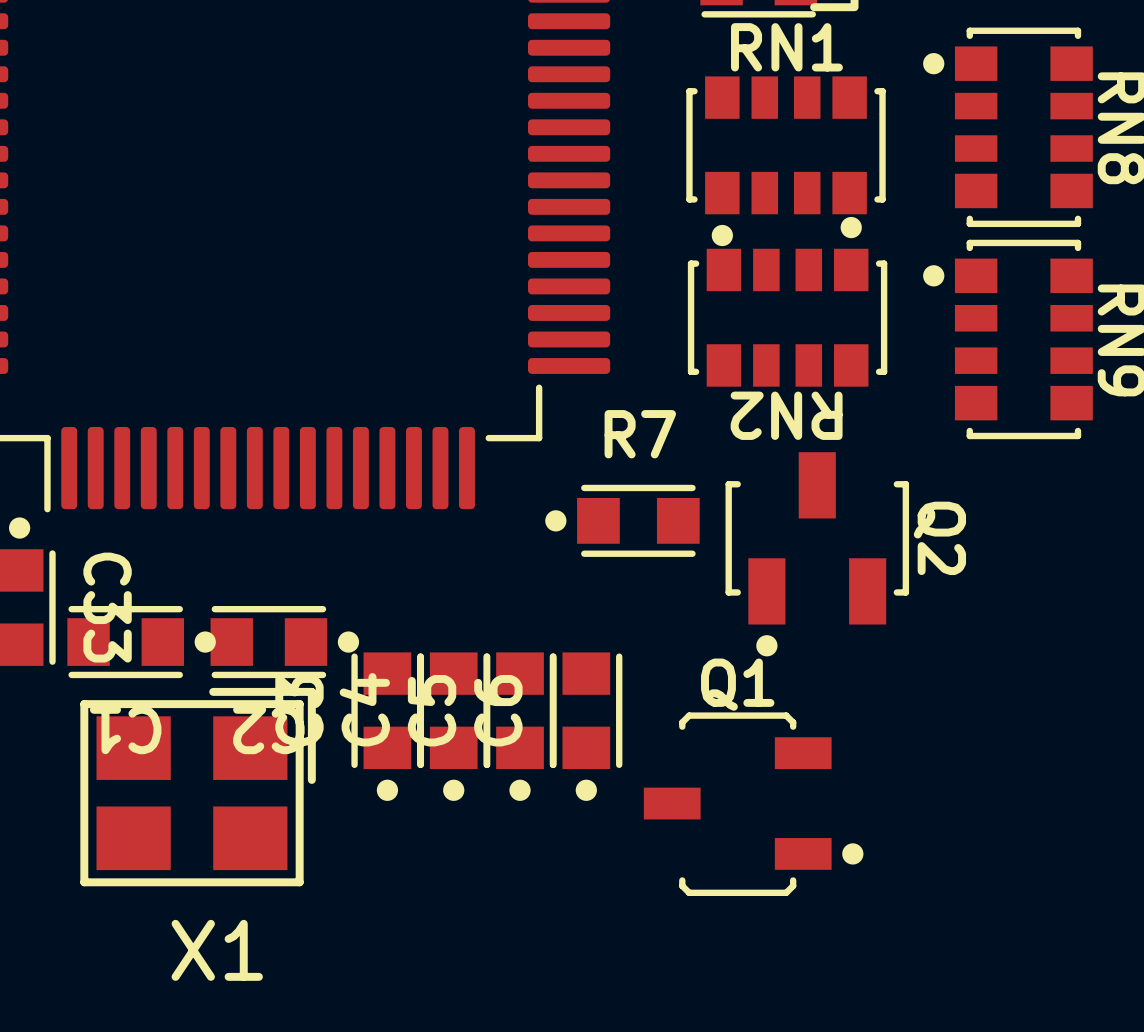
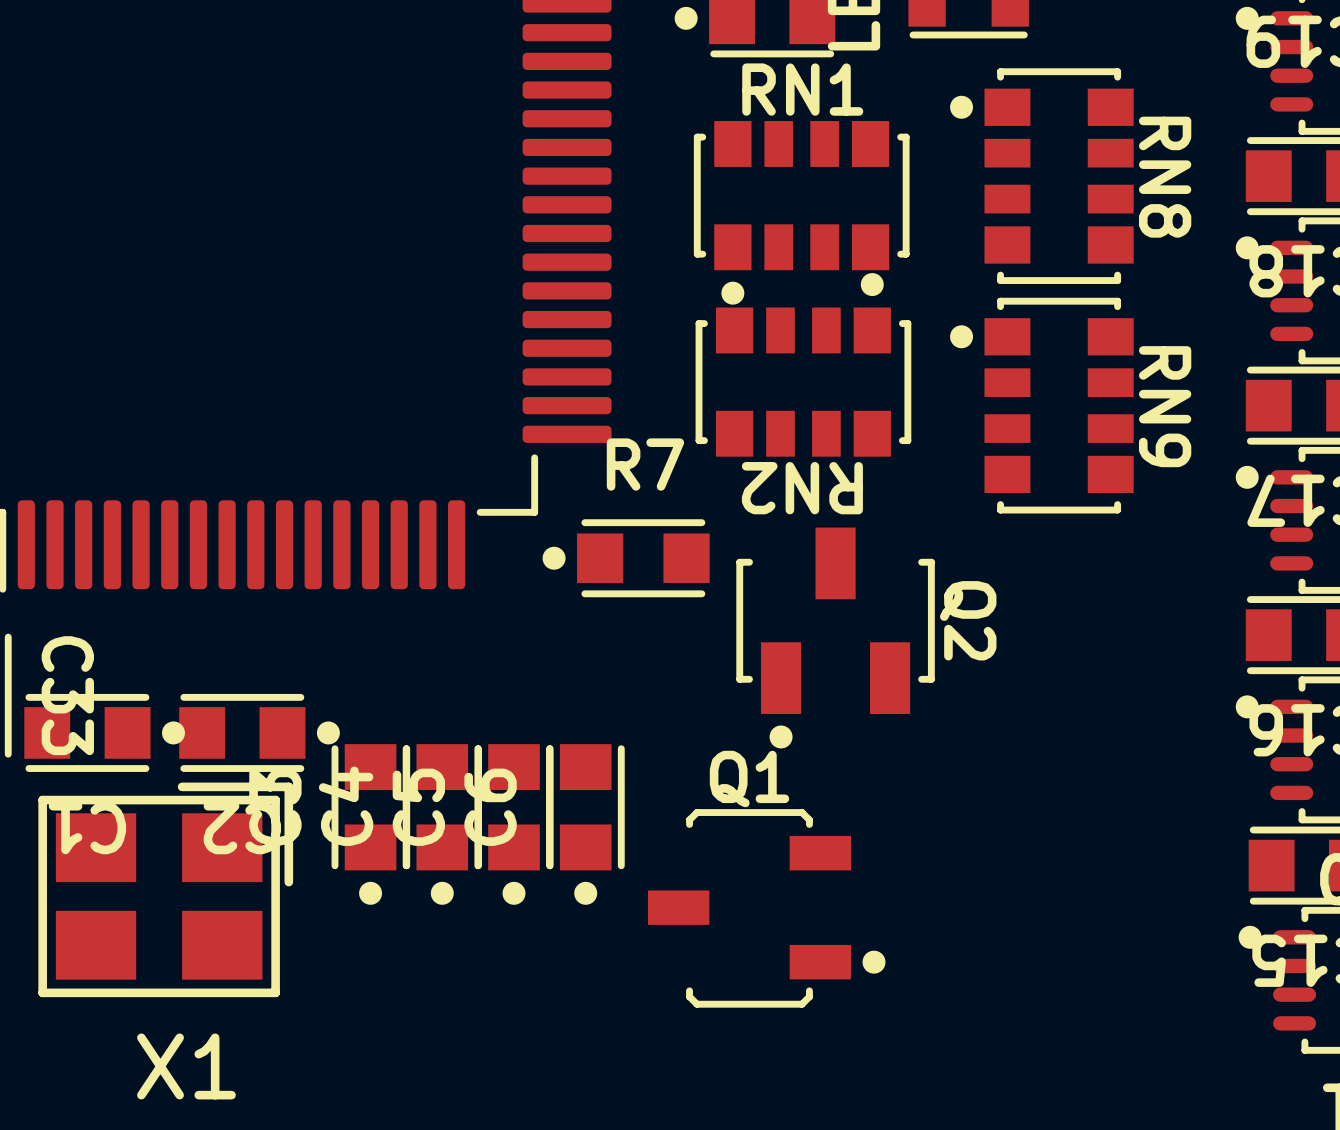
R7 position: (622, 520) -> (626, 558)

